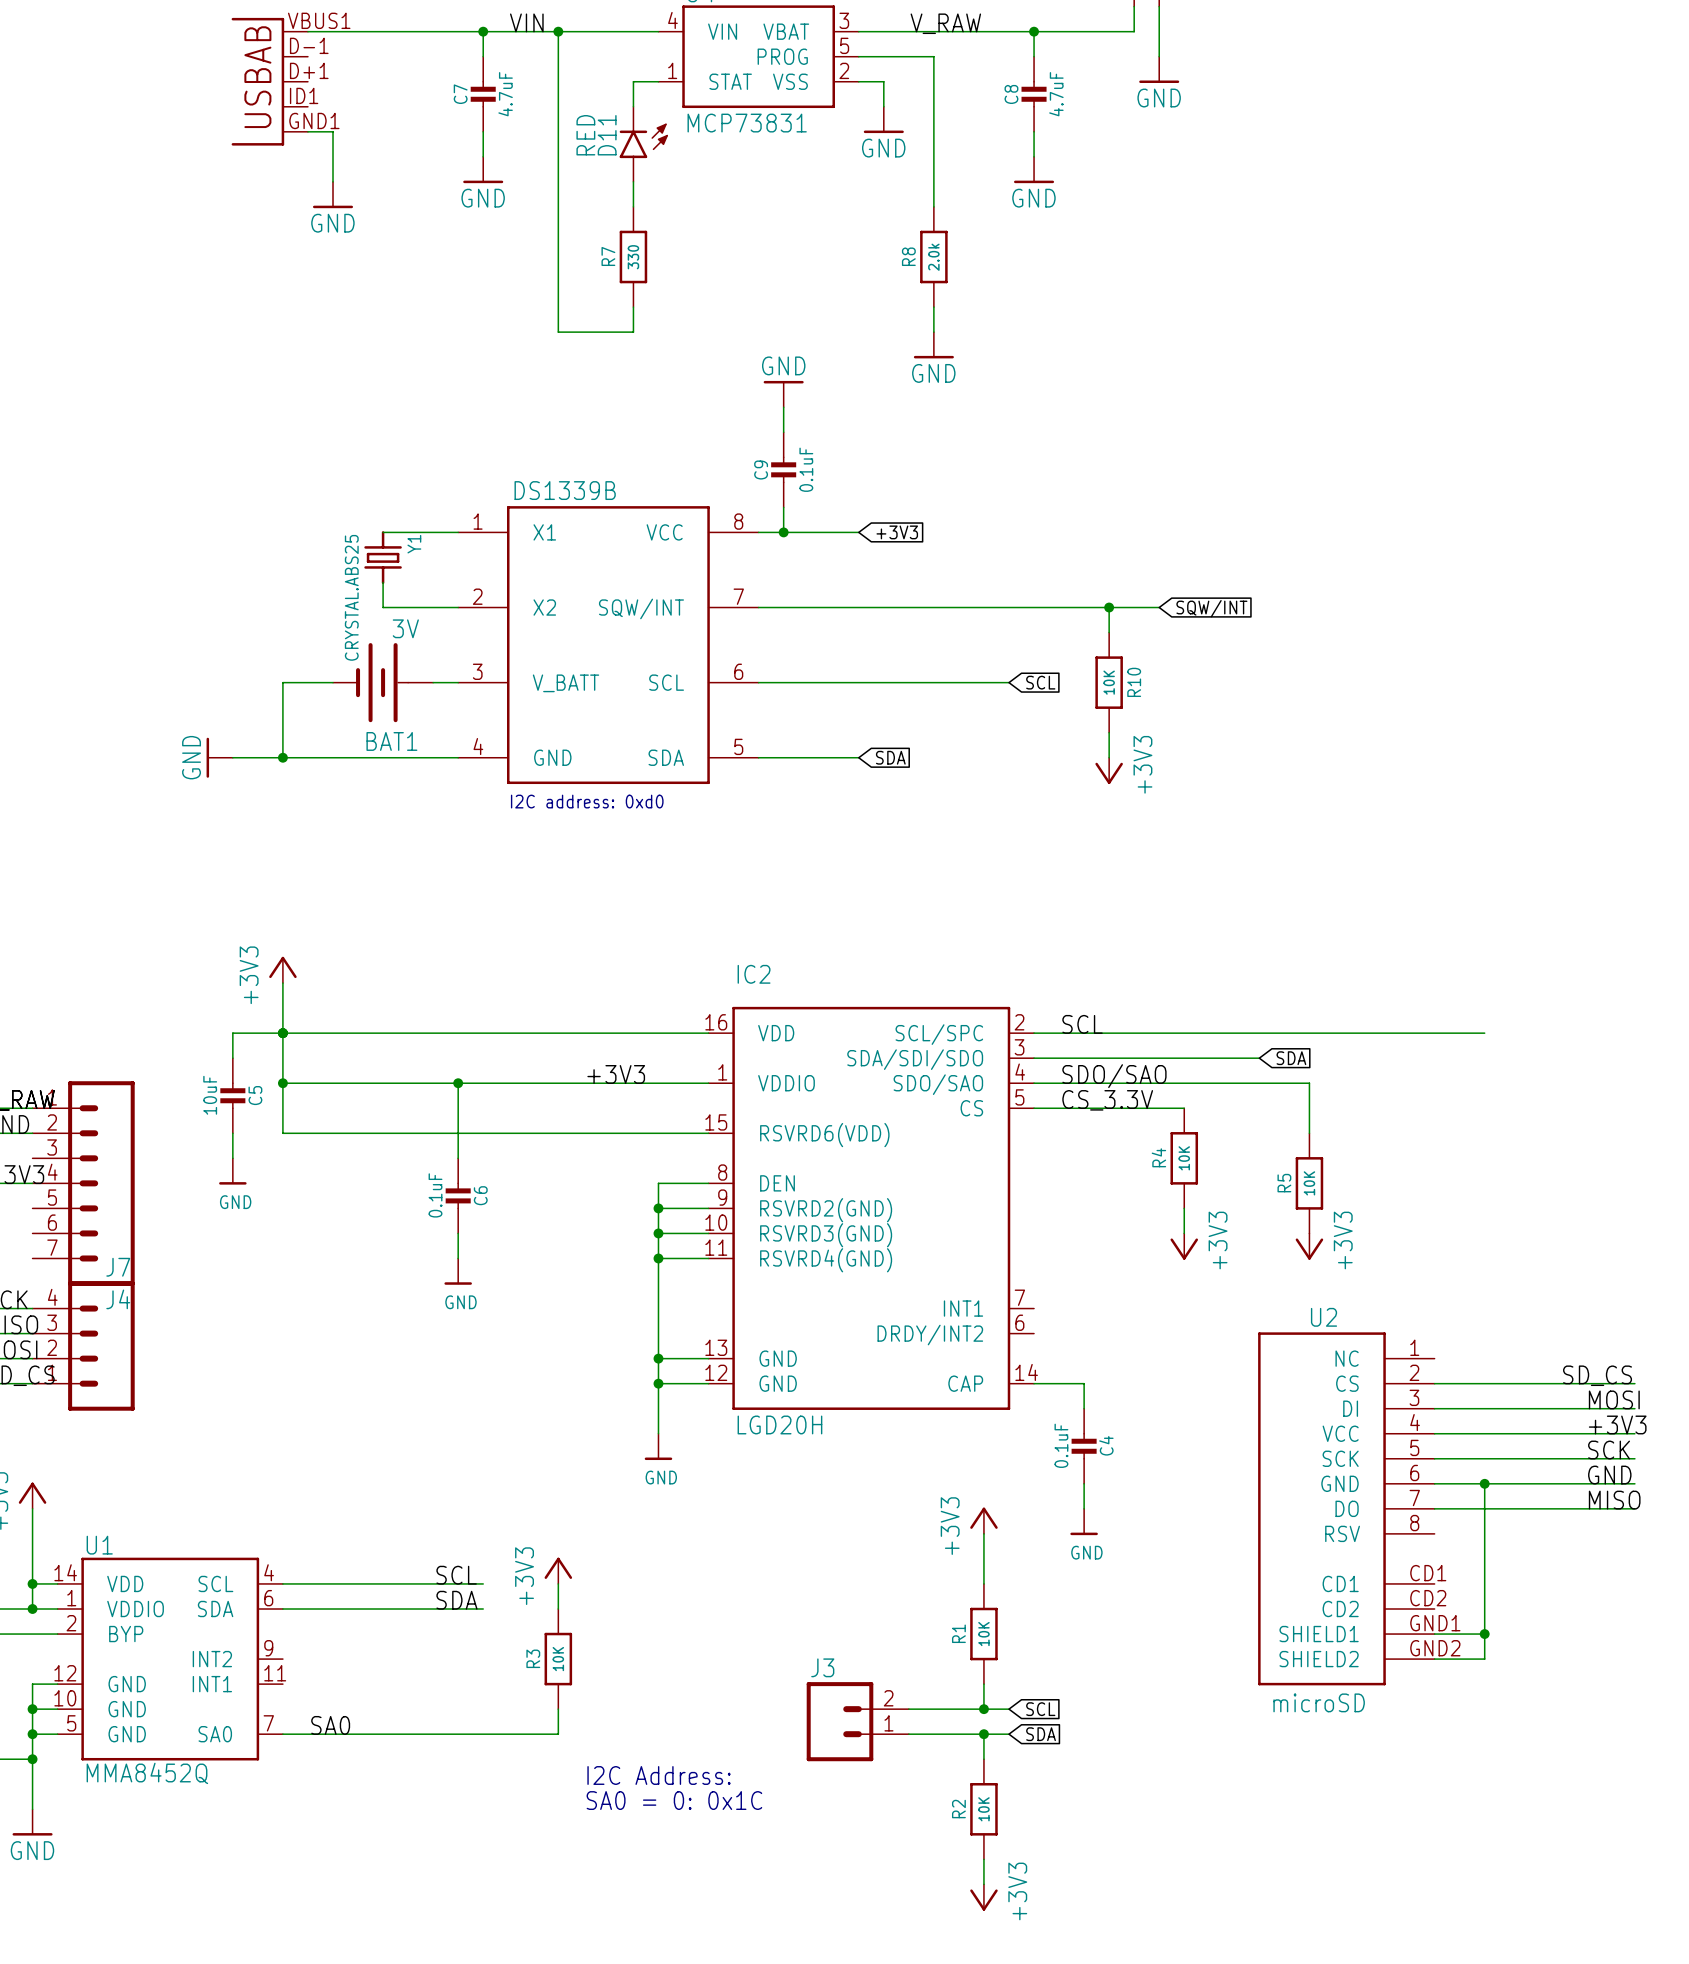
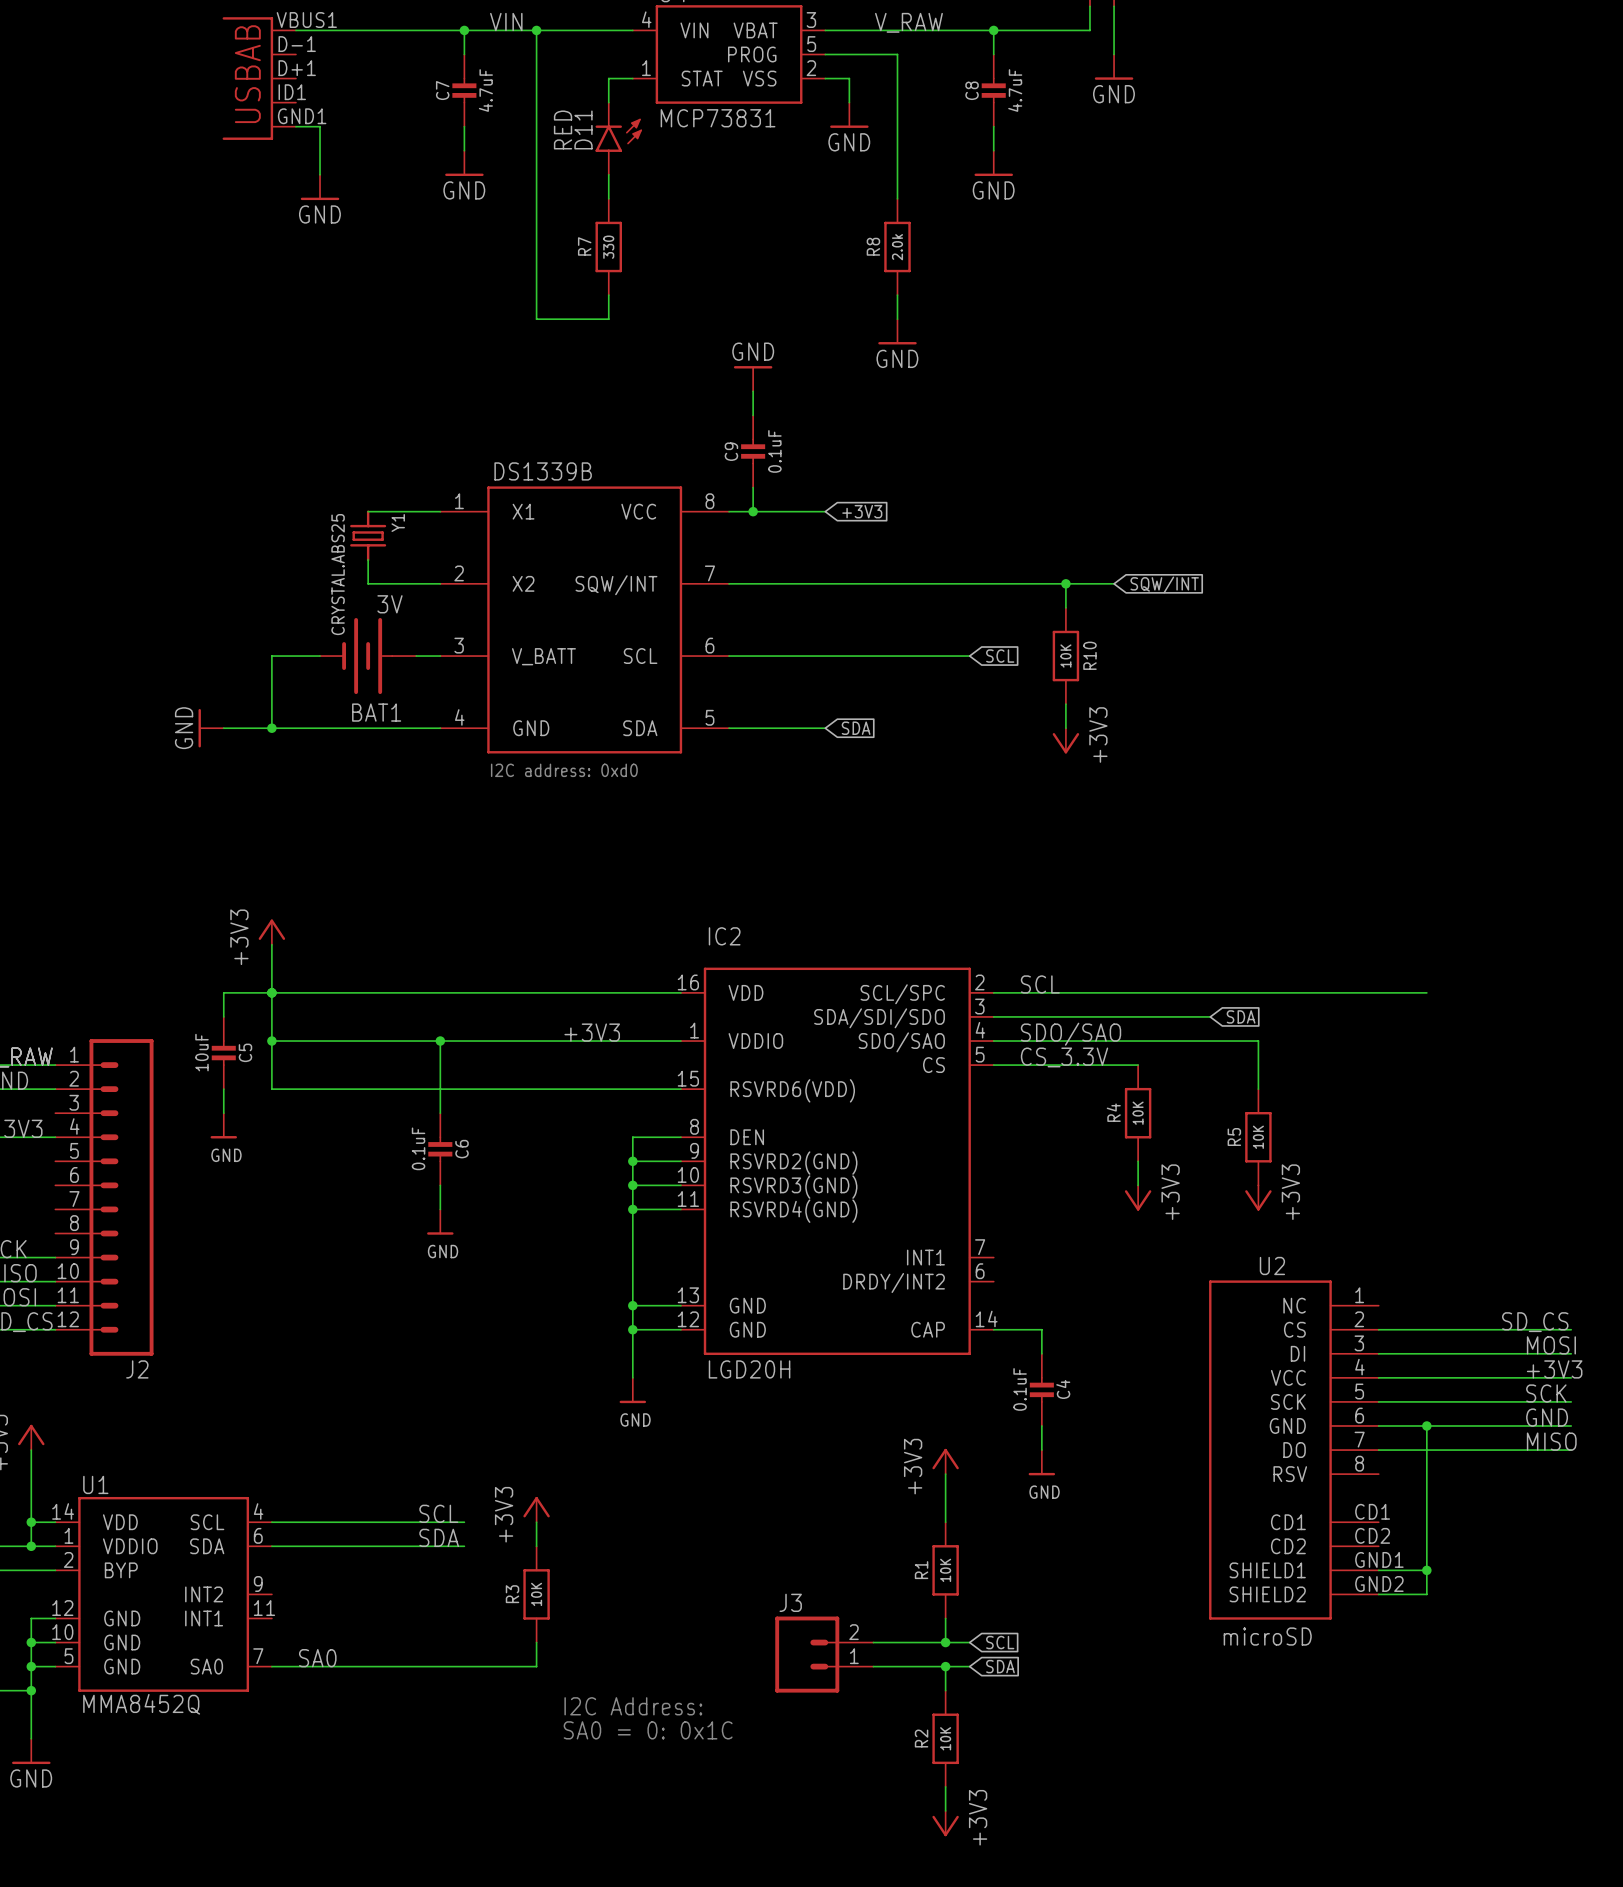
J4: (83, 1183) -> none
J2: none -> (104, 1197)
J7: (83, 1346) -> none

